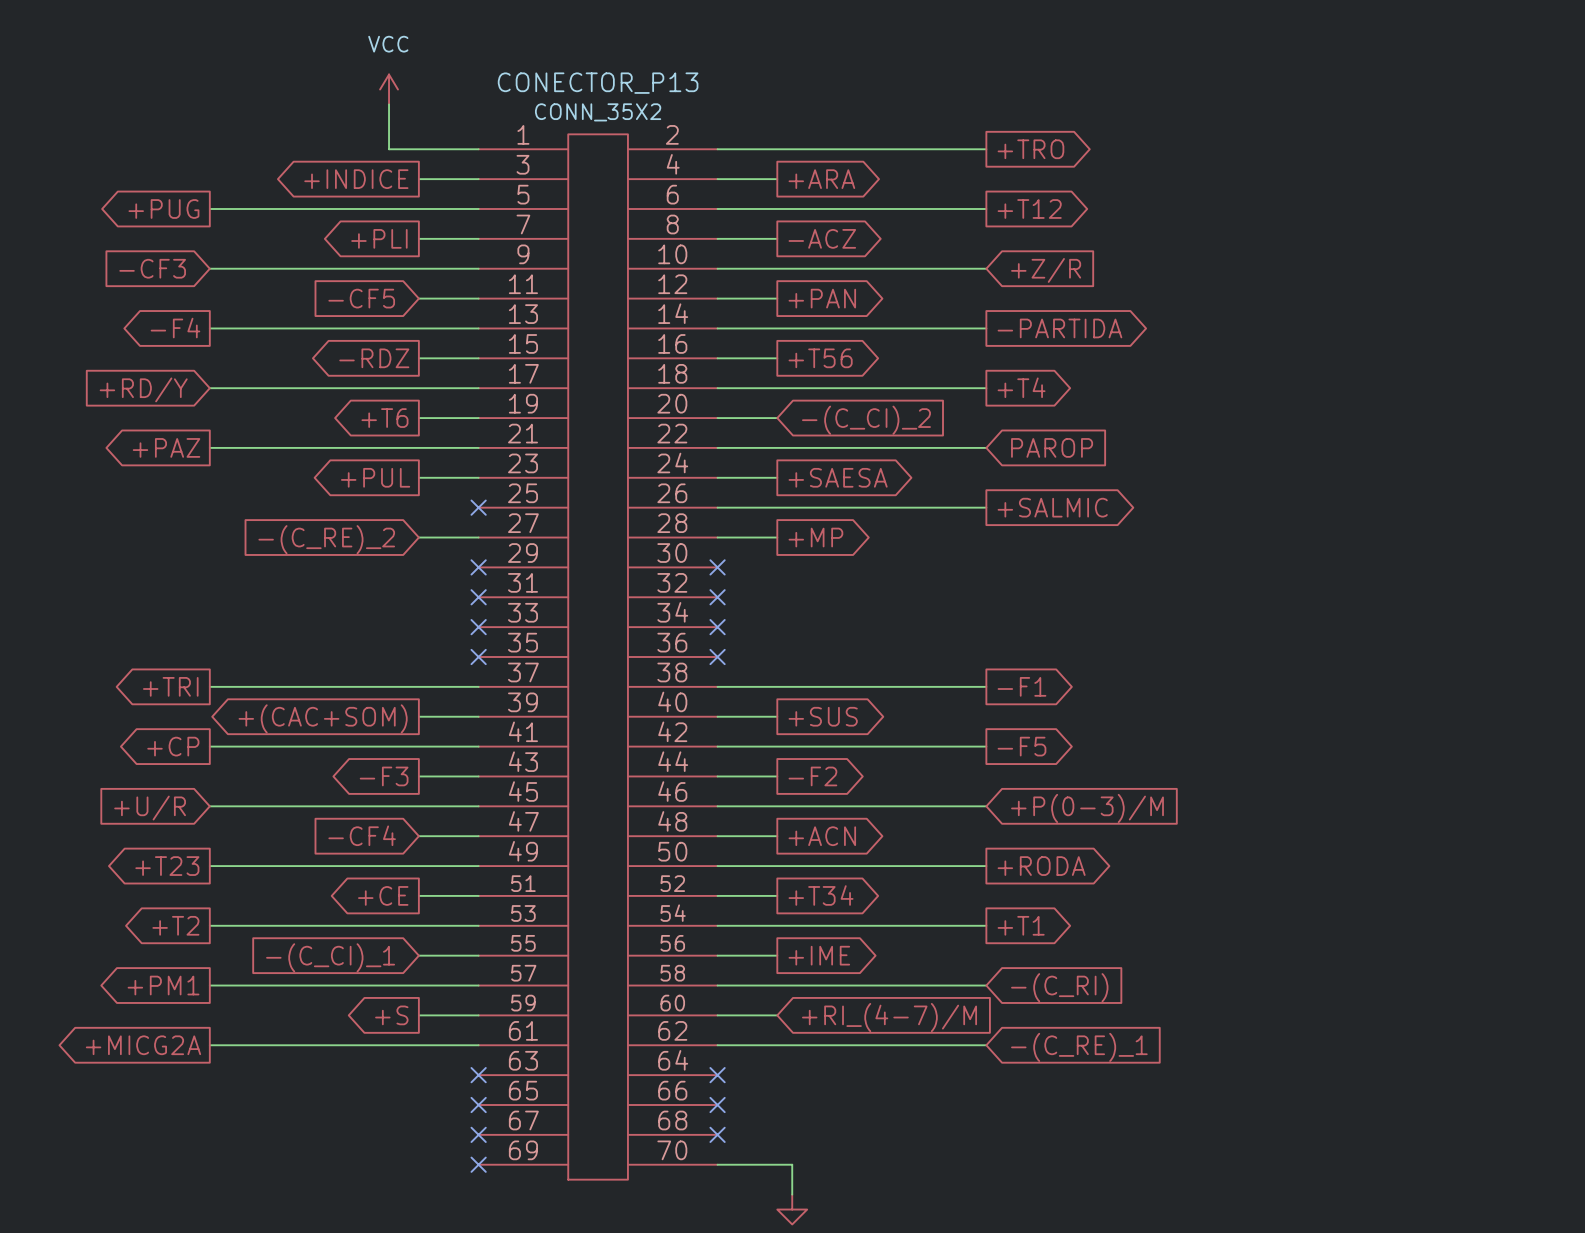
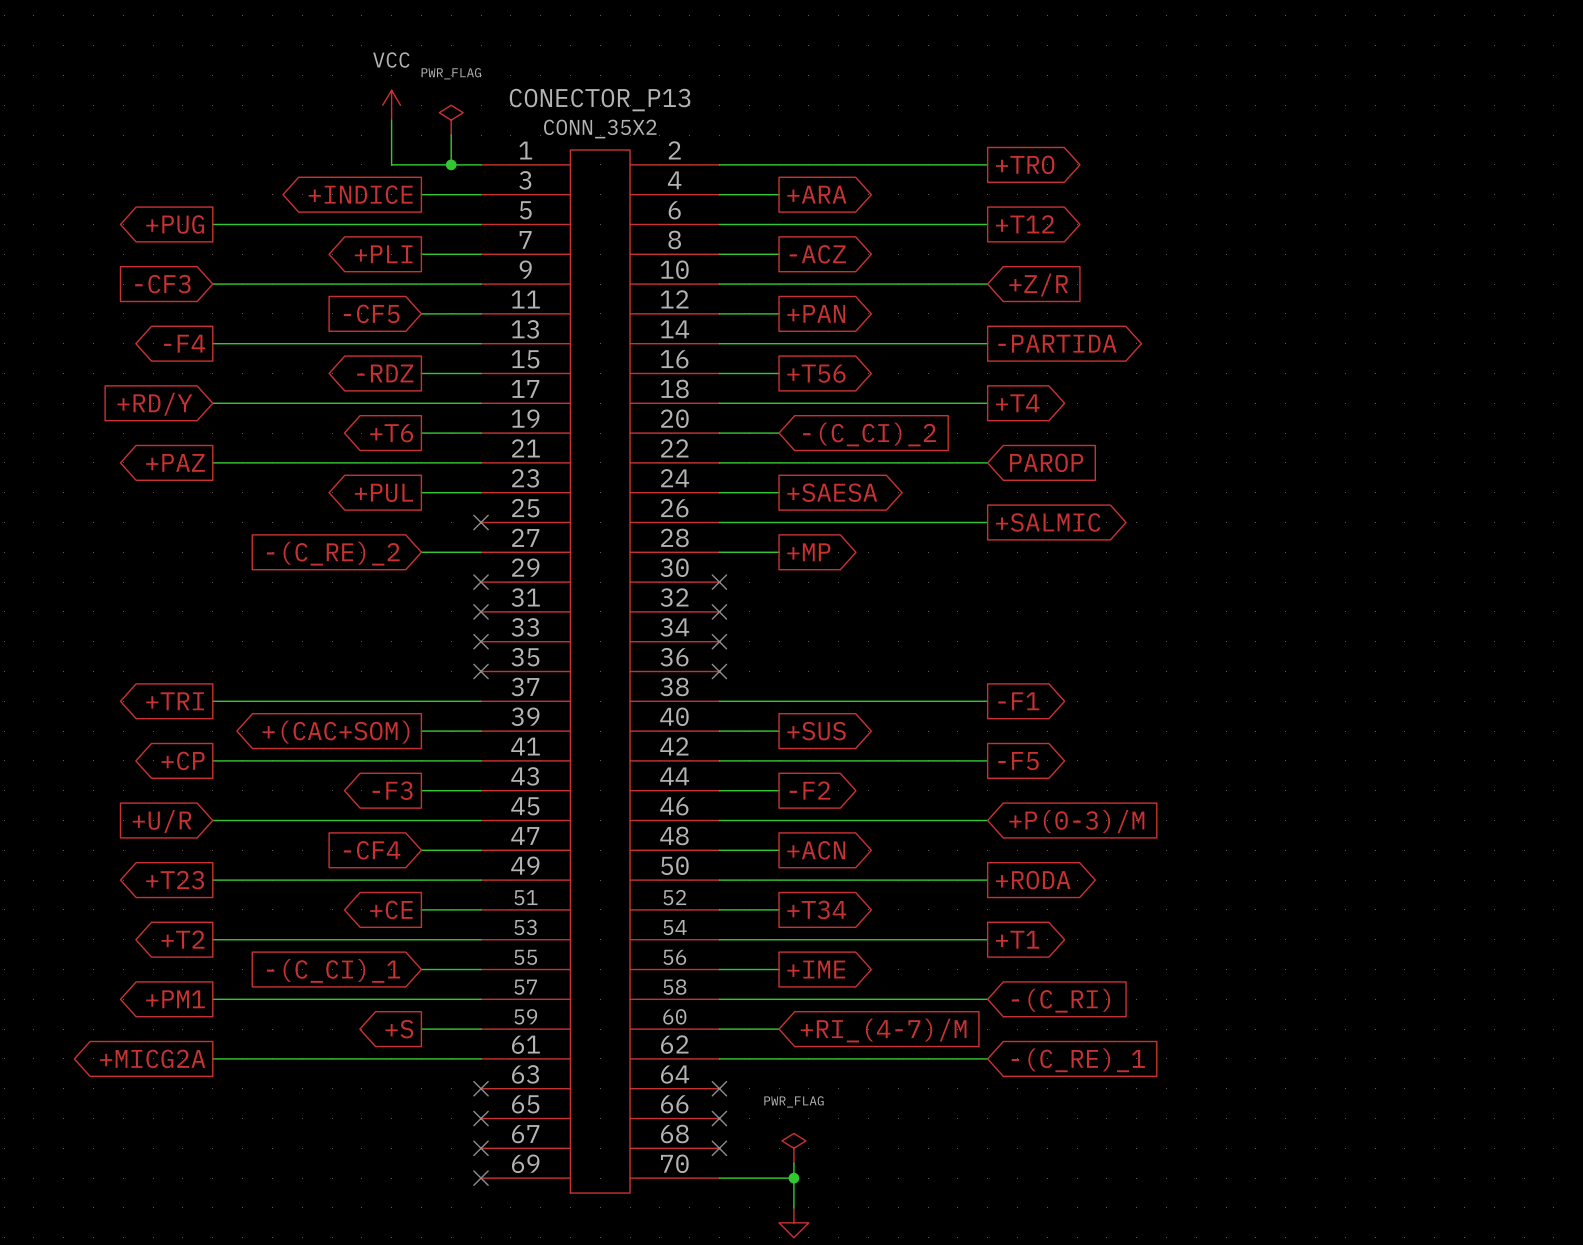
power symbol: none -> PWR_FLAG (451, 120)
wire: none -> (451, 135) (451, 164)
junction: none -> (451, 164)
power symbol: none -> PWR_FLAG (793, 1148)
wire: none -> (793, 1163) (793, 1178)
junction: none -> (793, 1178)

